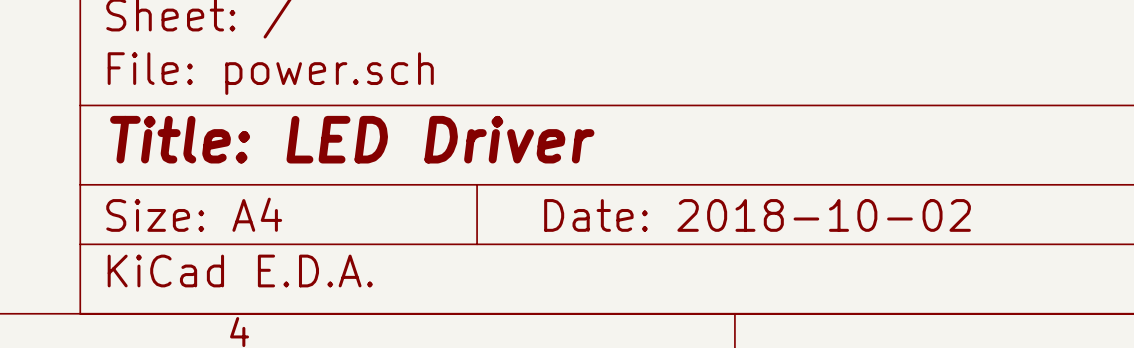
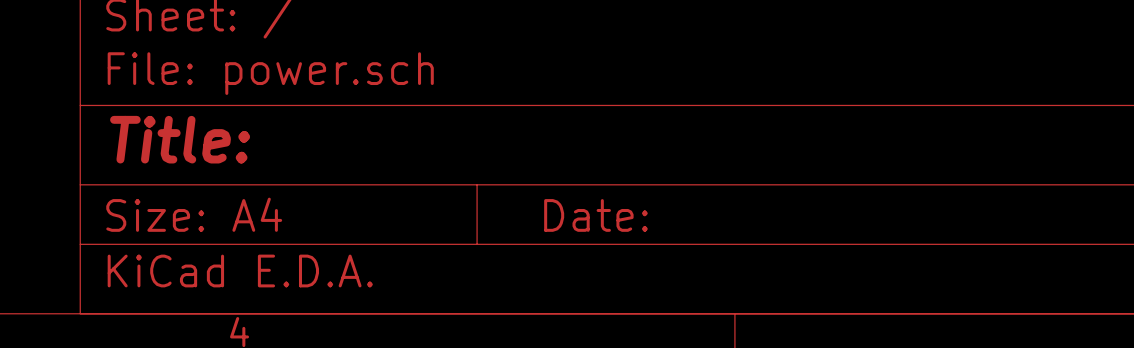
title block: Title: LED Driver (352, 139) -> Title: (180, 139)
title block: Date: 2018-10-02 (757, 215) -> Date: (595, 215)

